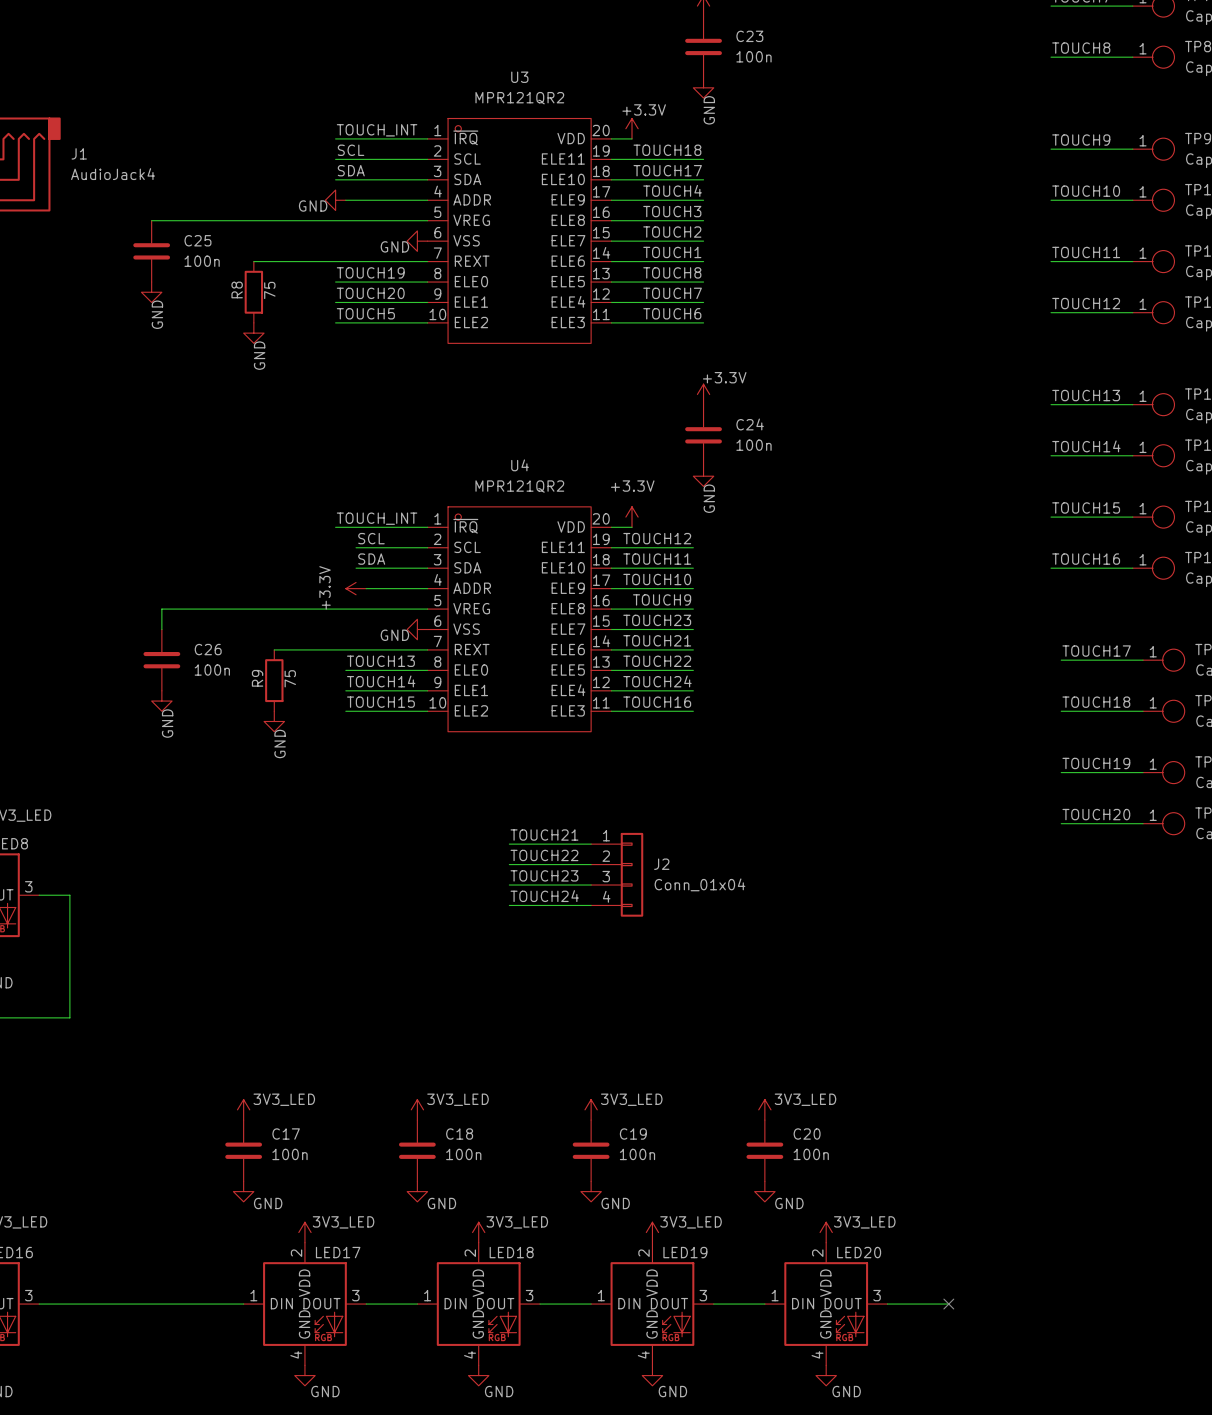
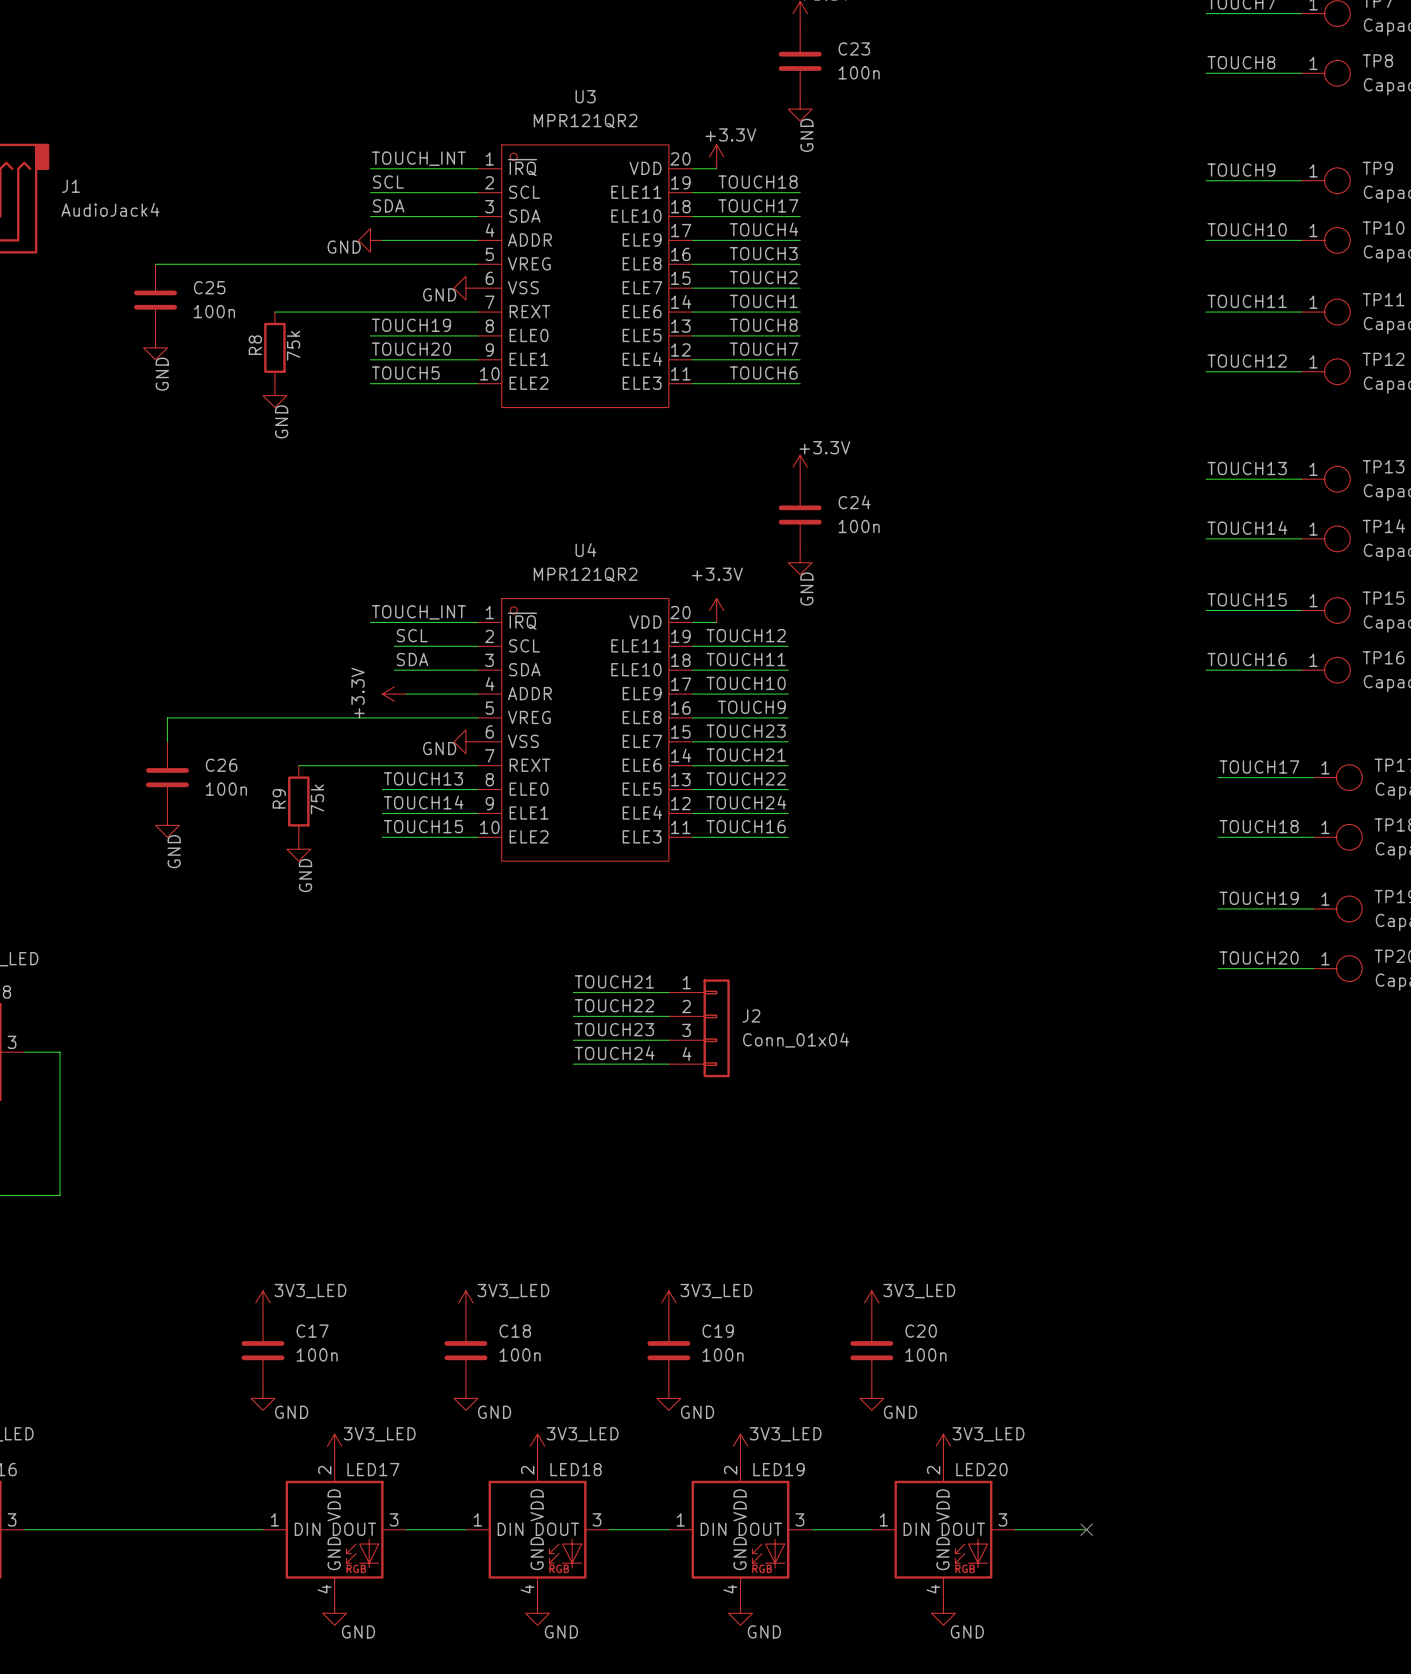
R8 value: 75 (269, 290) -> 75k (293, 345)
R9 value: 75 (290, 678) -> 75k (317, 799)

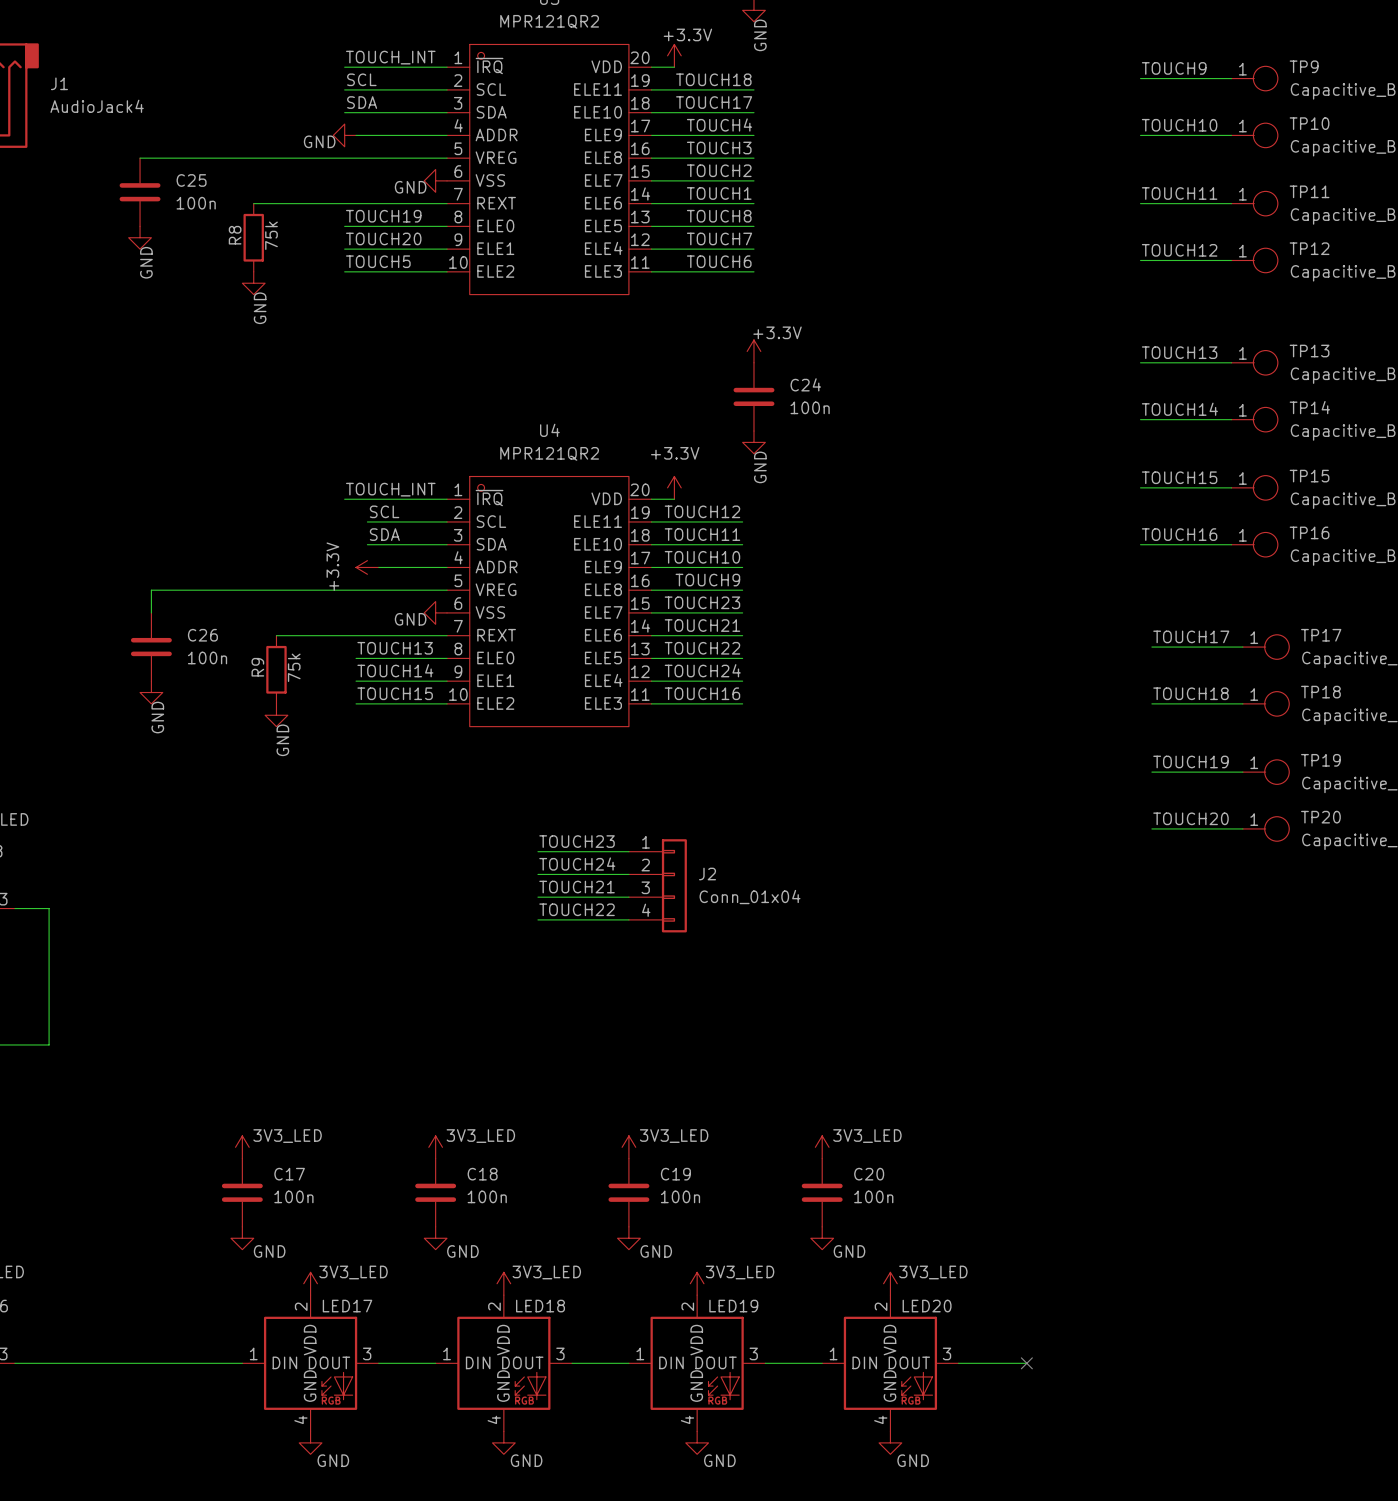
label: TOUCH21 (614, 981) -> TOUCH23 (577, 841)
label: TOUCH22 (614, 1005) -> TOUCH24 (577, 864)
label: TOUCH23 (614, 1029) -> TOUCH21 (577, 887)
label: TOUCH24 (614, 1053) -> TOUCH22 (577, 909)

